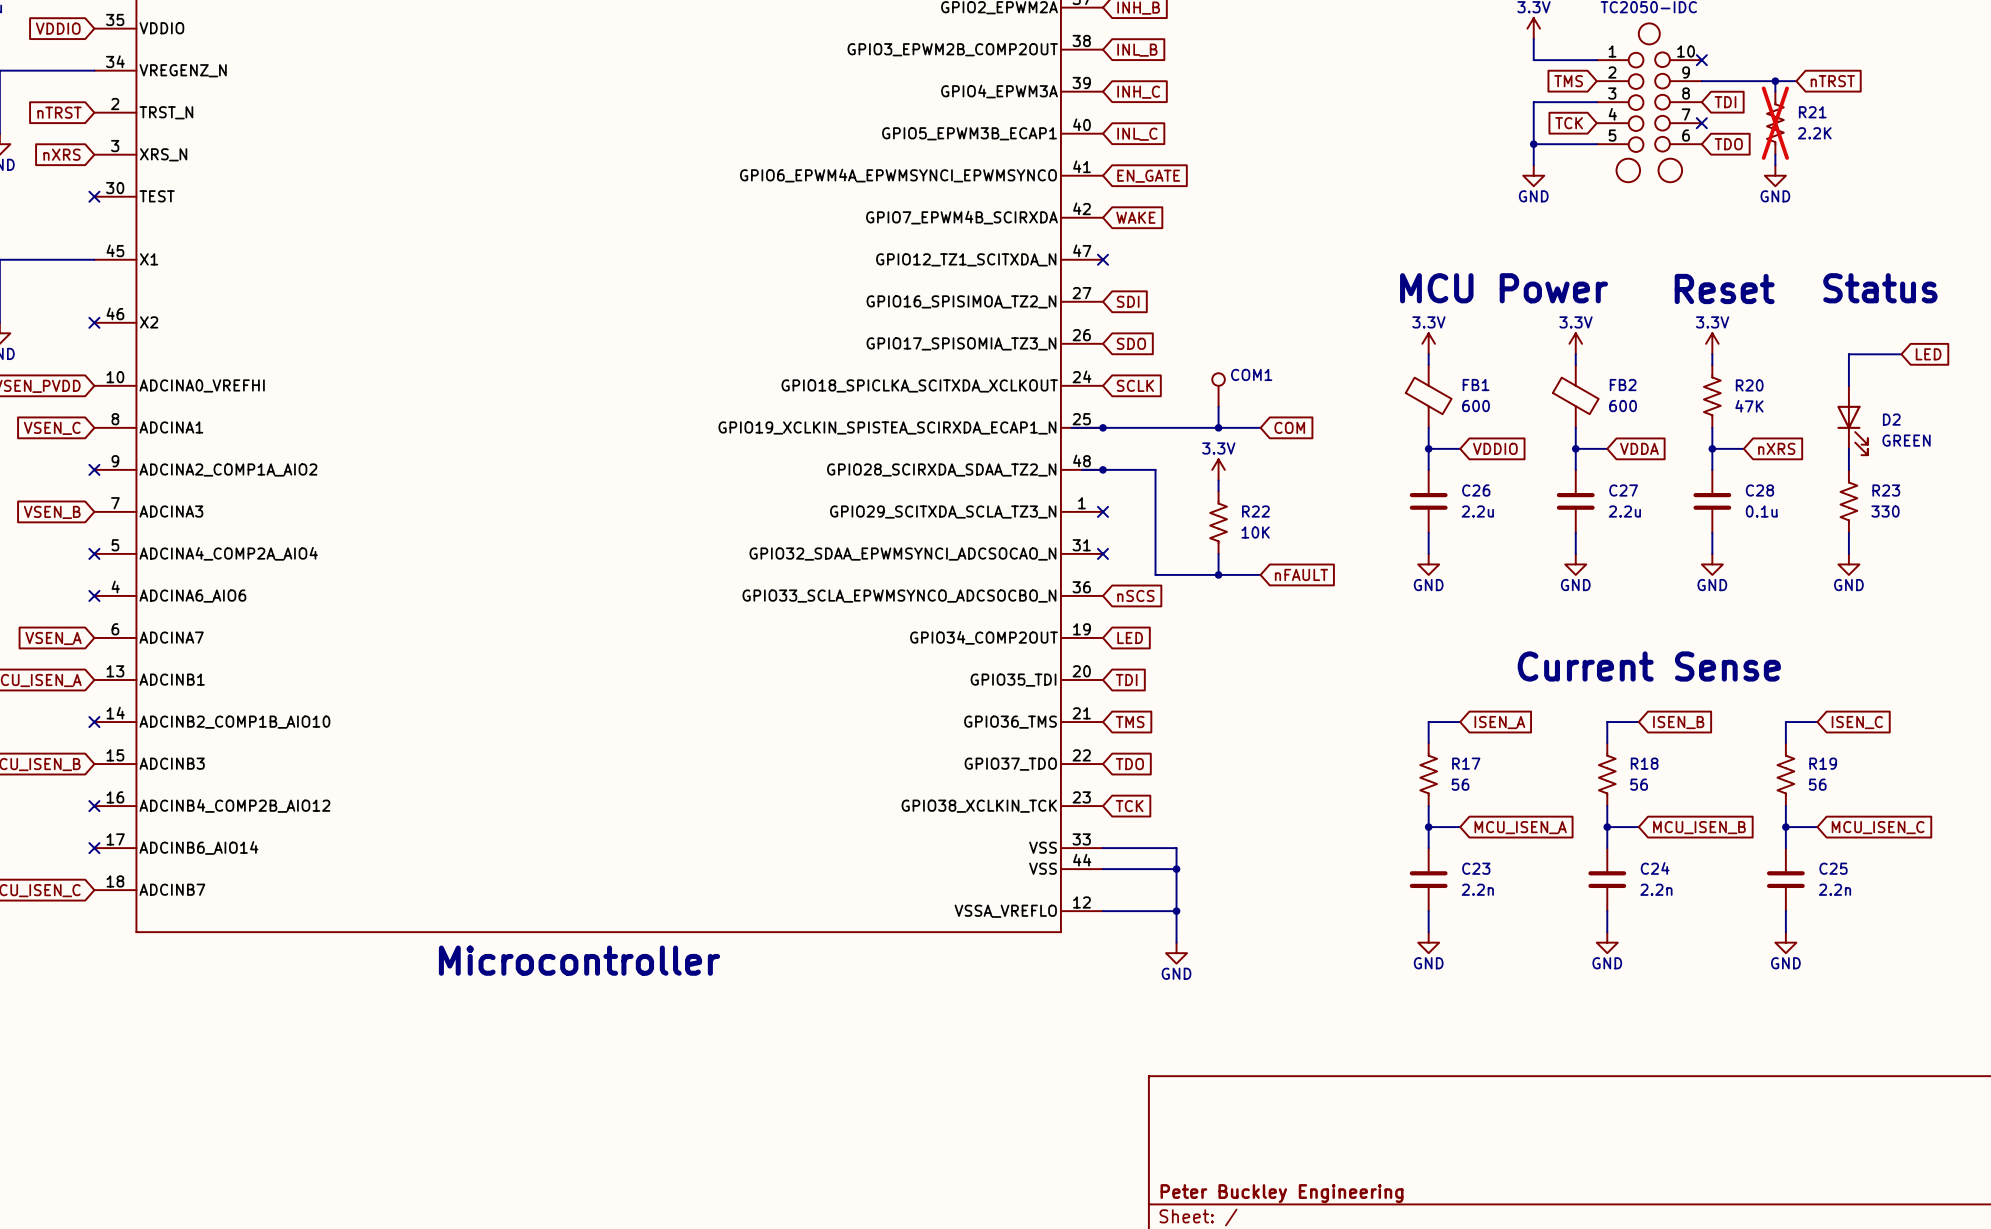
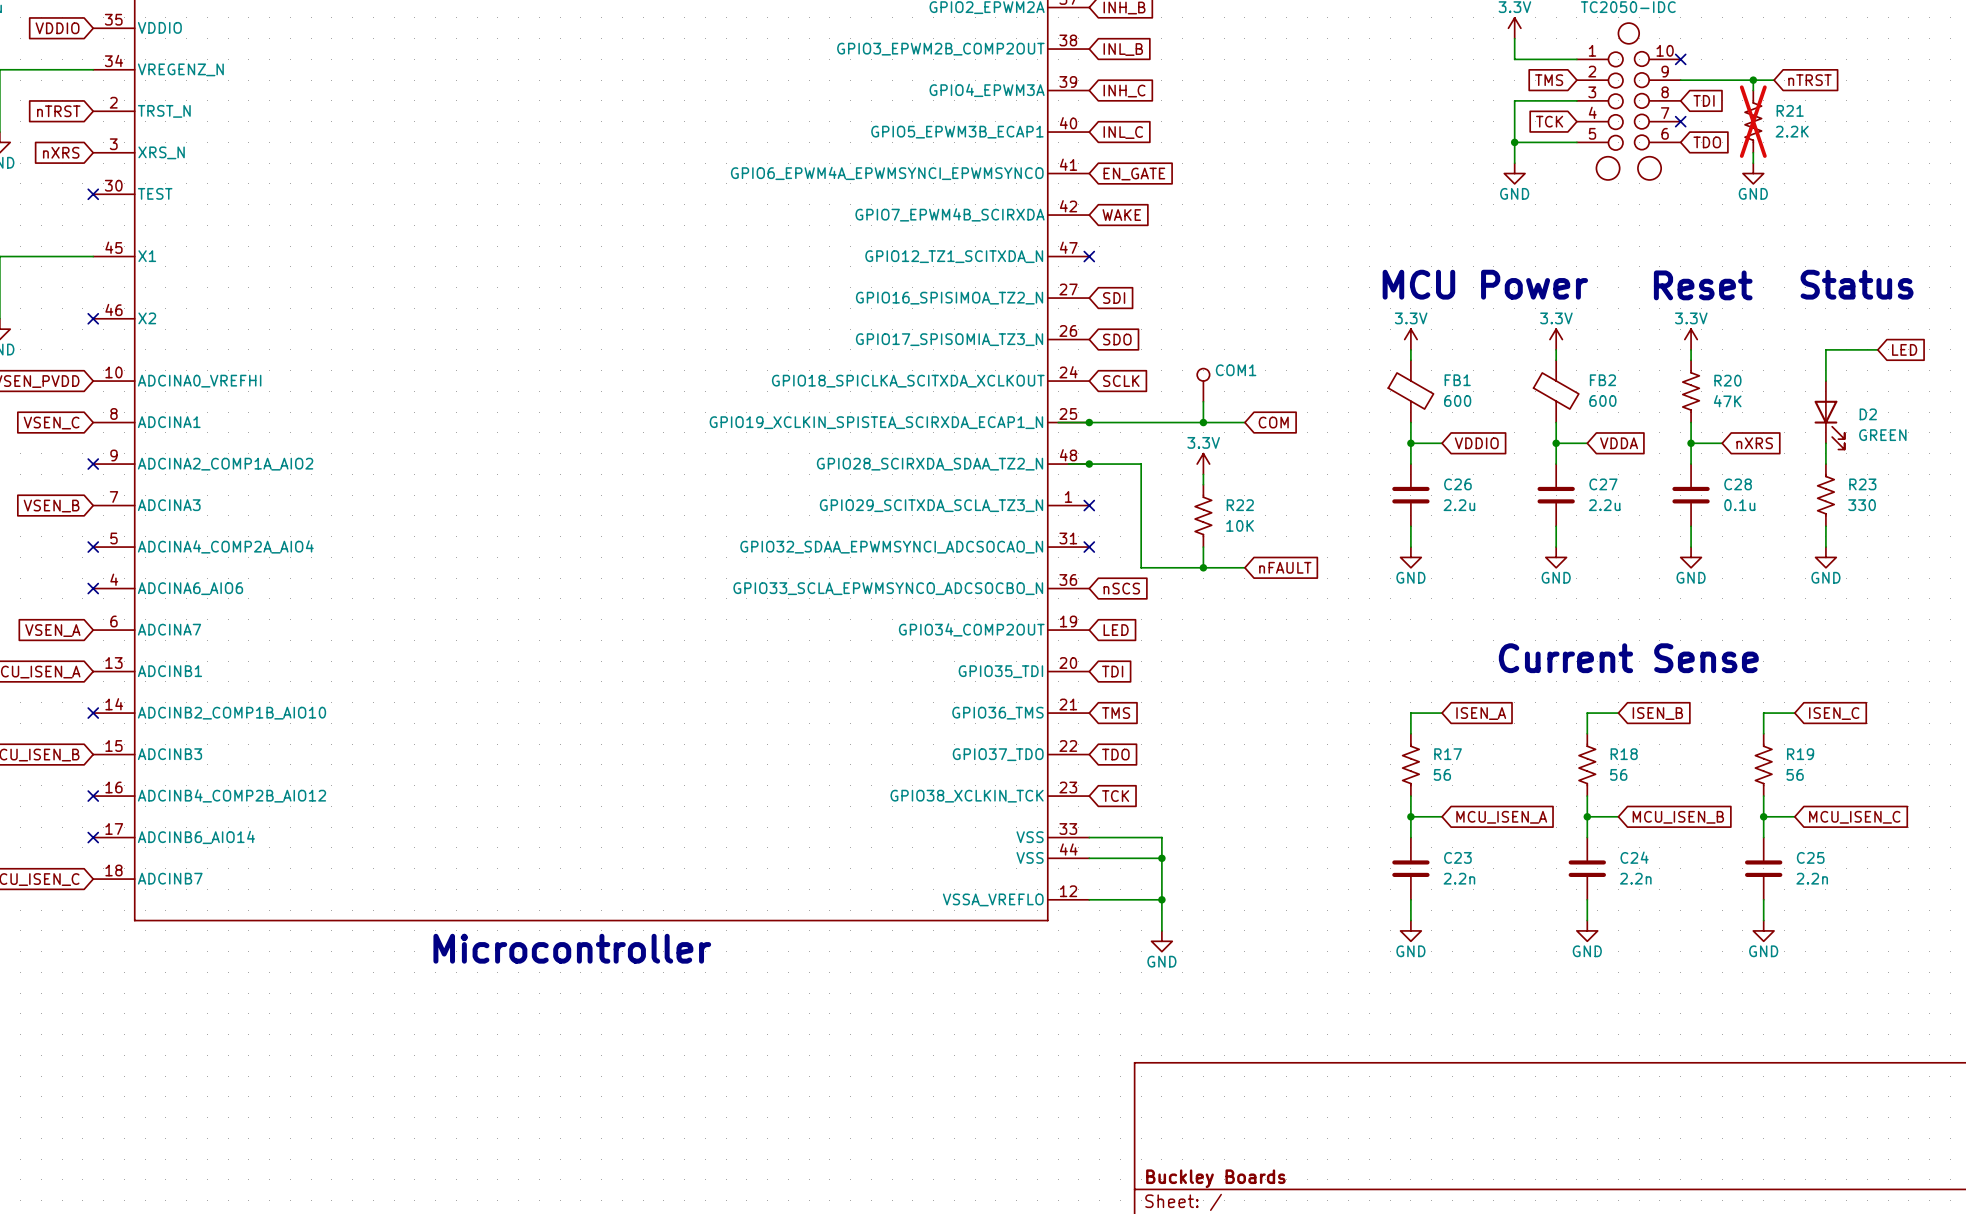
title block: Peter Buckley Engineering (1282, 1193) -> Buckley Boards (1215, 1178)

